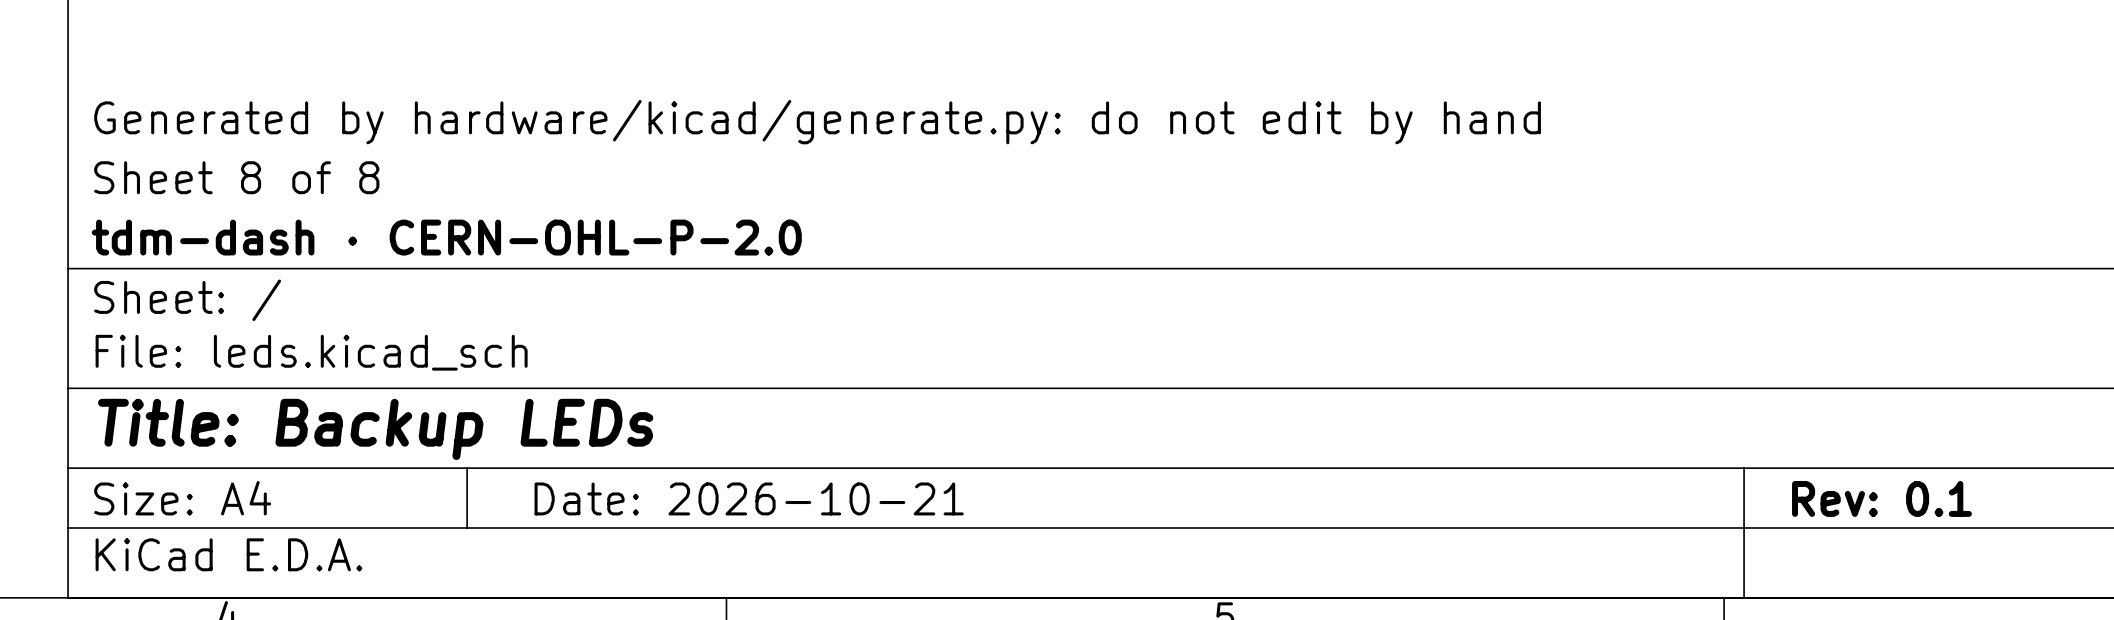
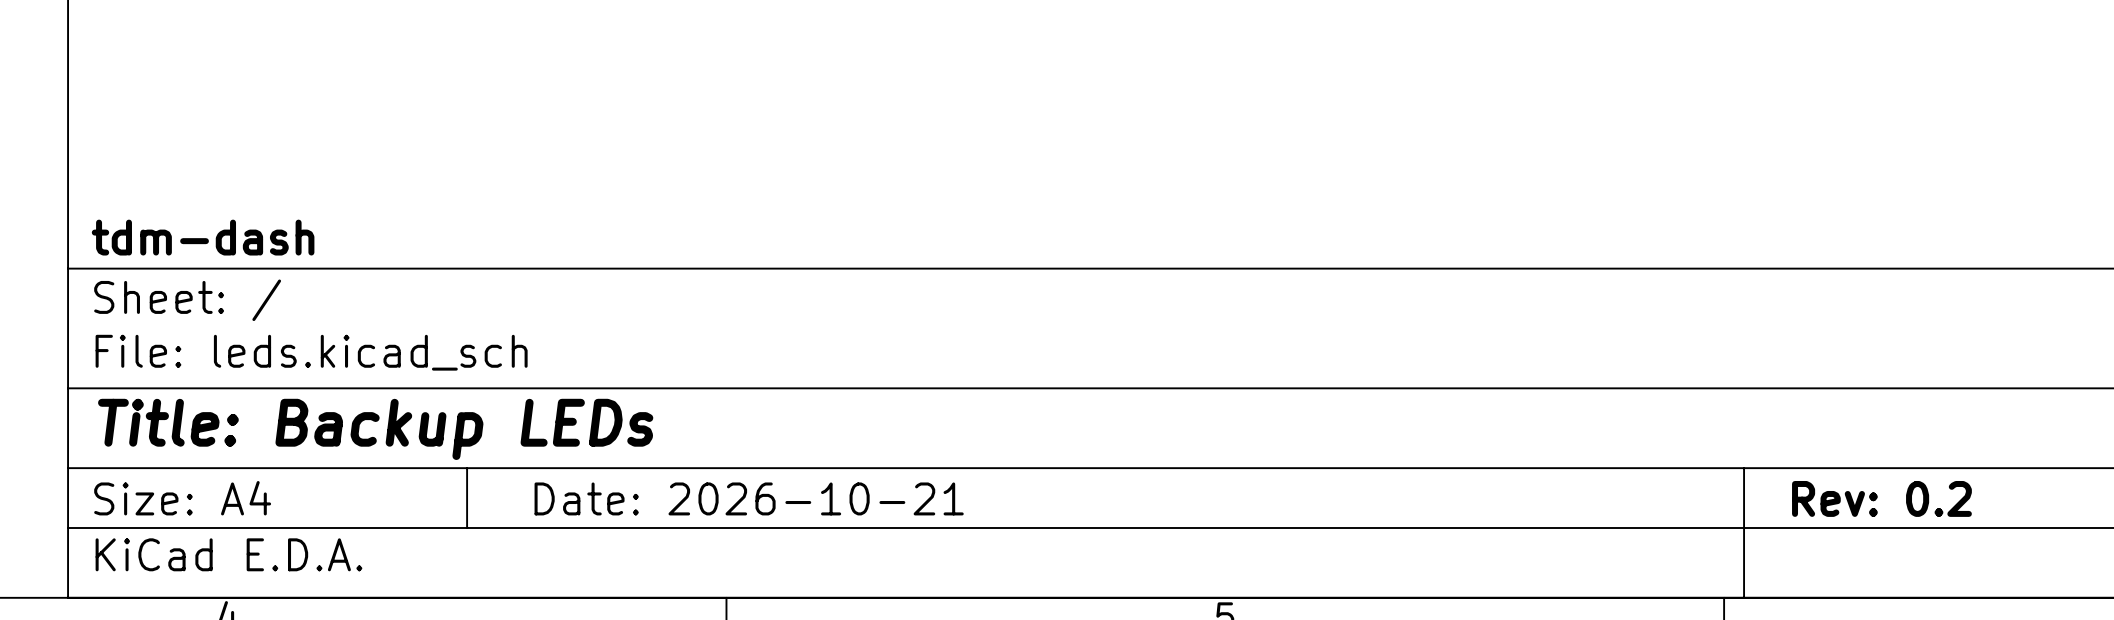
title block: Generated by hardware/kicad/generate.py: do not edit by hand (817, 122) -> none
title block: Sheet 8 of 8 (236, 177) -> none
title block: tdm-dash · CERN-OHL-P-2.0 (446, 237) -> tdm-dash (203, 237)
title block: Rev: 0.1 (1881, 498) -> Rev: 0.2 (1881, 498)

